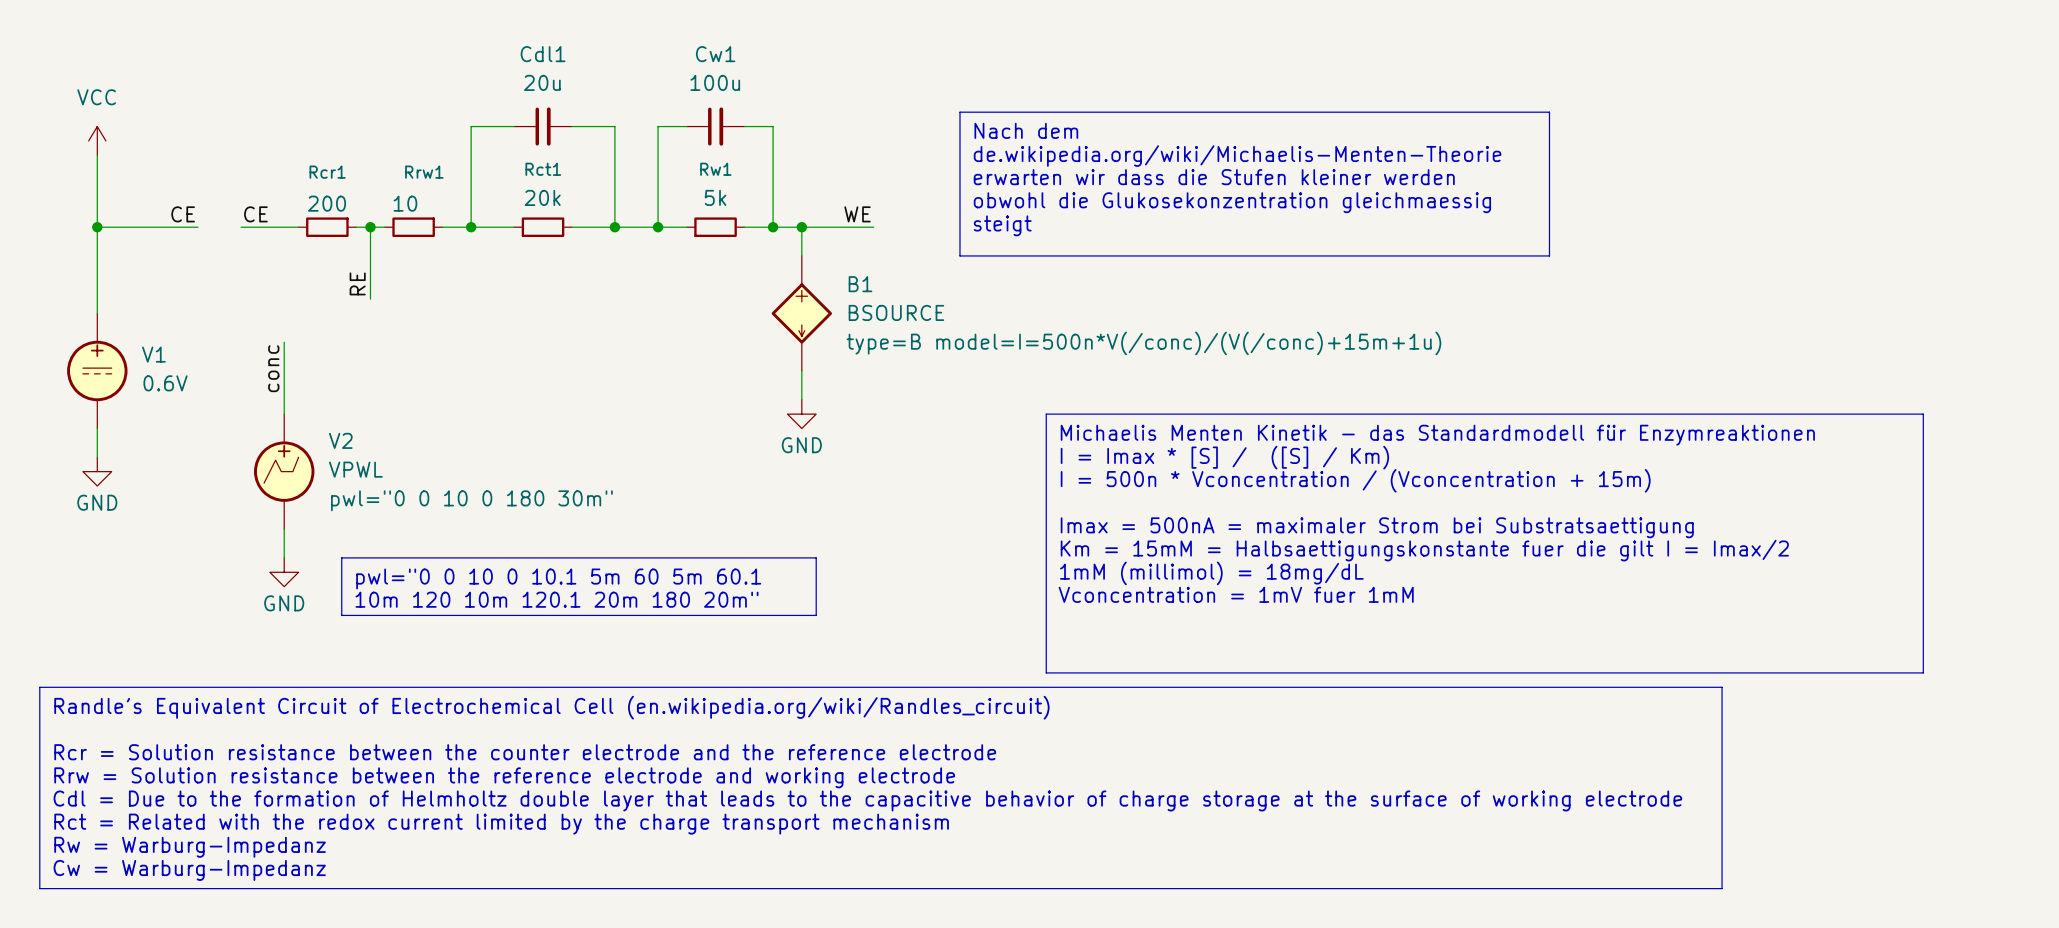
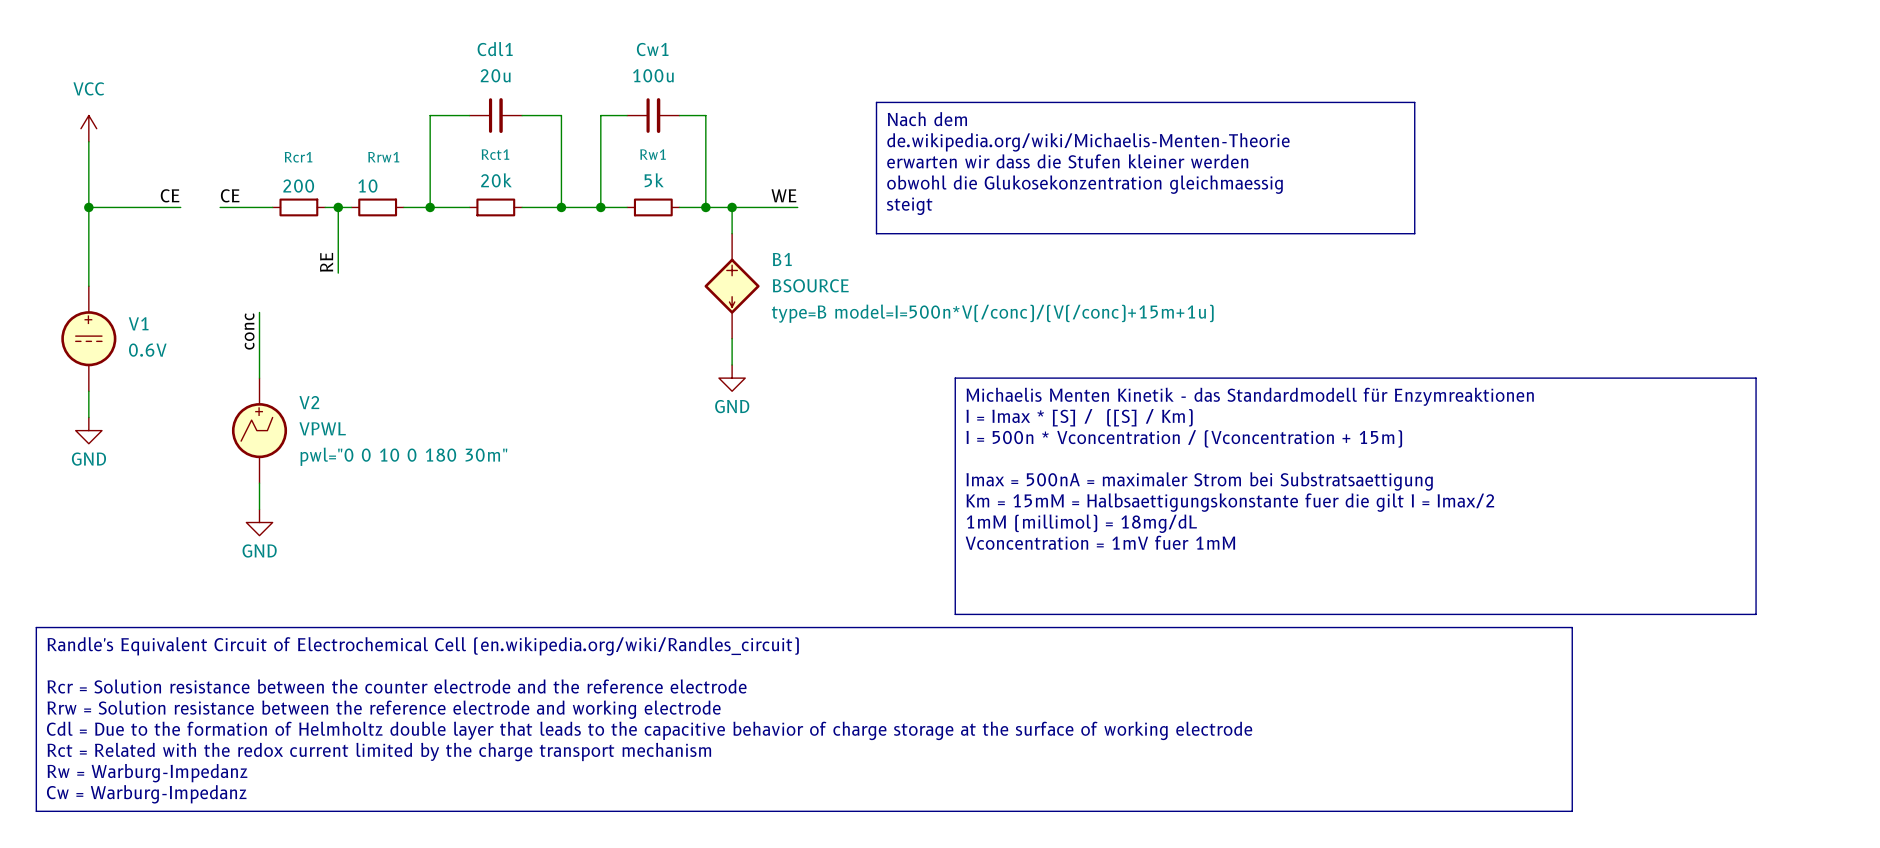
line: (341, 557) (816, 557) (816, 615) (341, 615) (341, 557) -> none
text: pwl="0 0 10 0 10.1 5m 60 5m 60.1 (558, 578) -> none
text: 10m 120 10m 120.1 20m 180 20m" (557, 599) -> none

